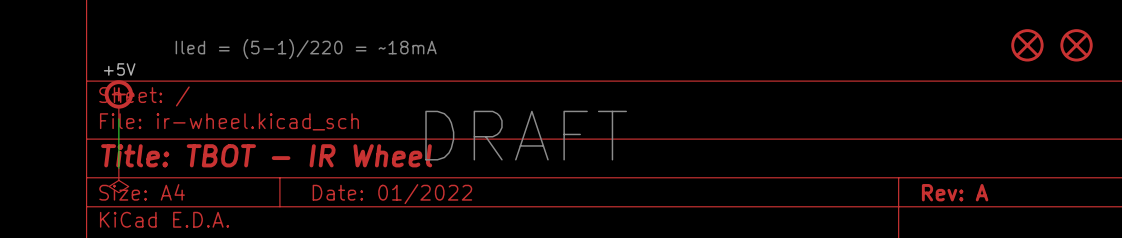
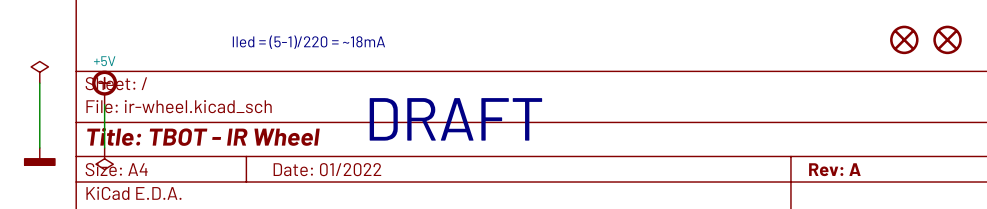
power symbol: none -> (39, 72)
wire: none -> (39, 83) (39, 147)
power symbol: none -> (39, 156)

